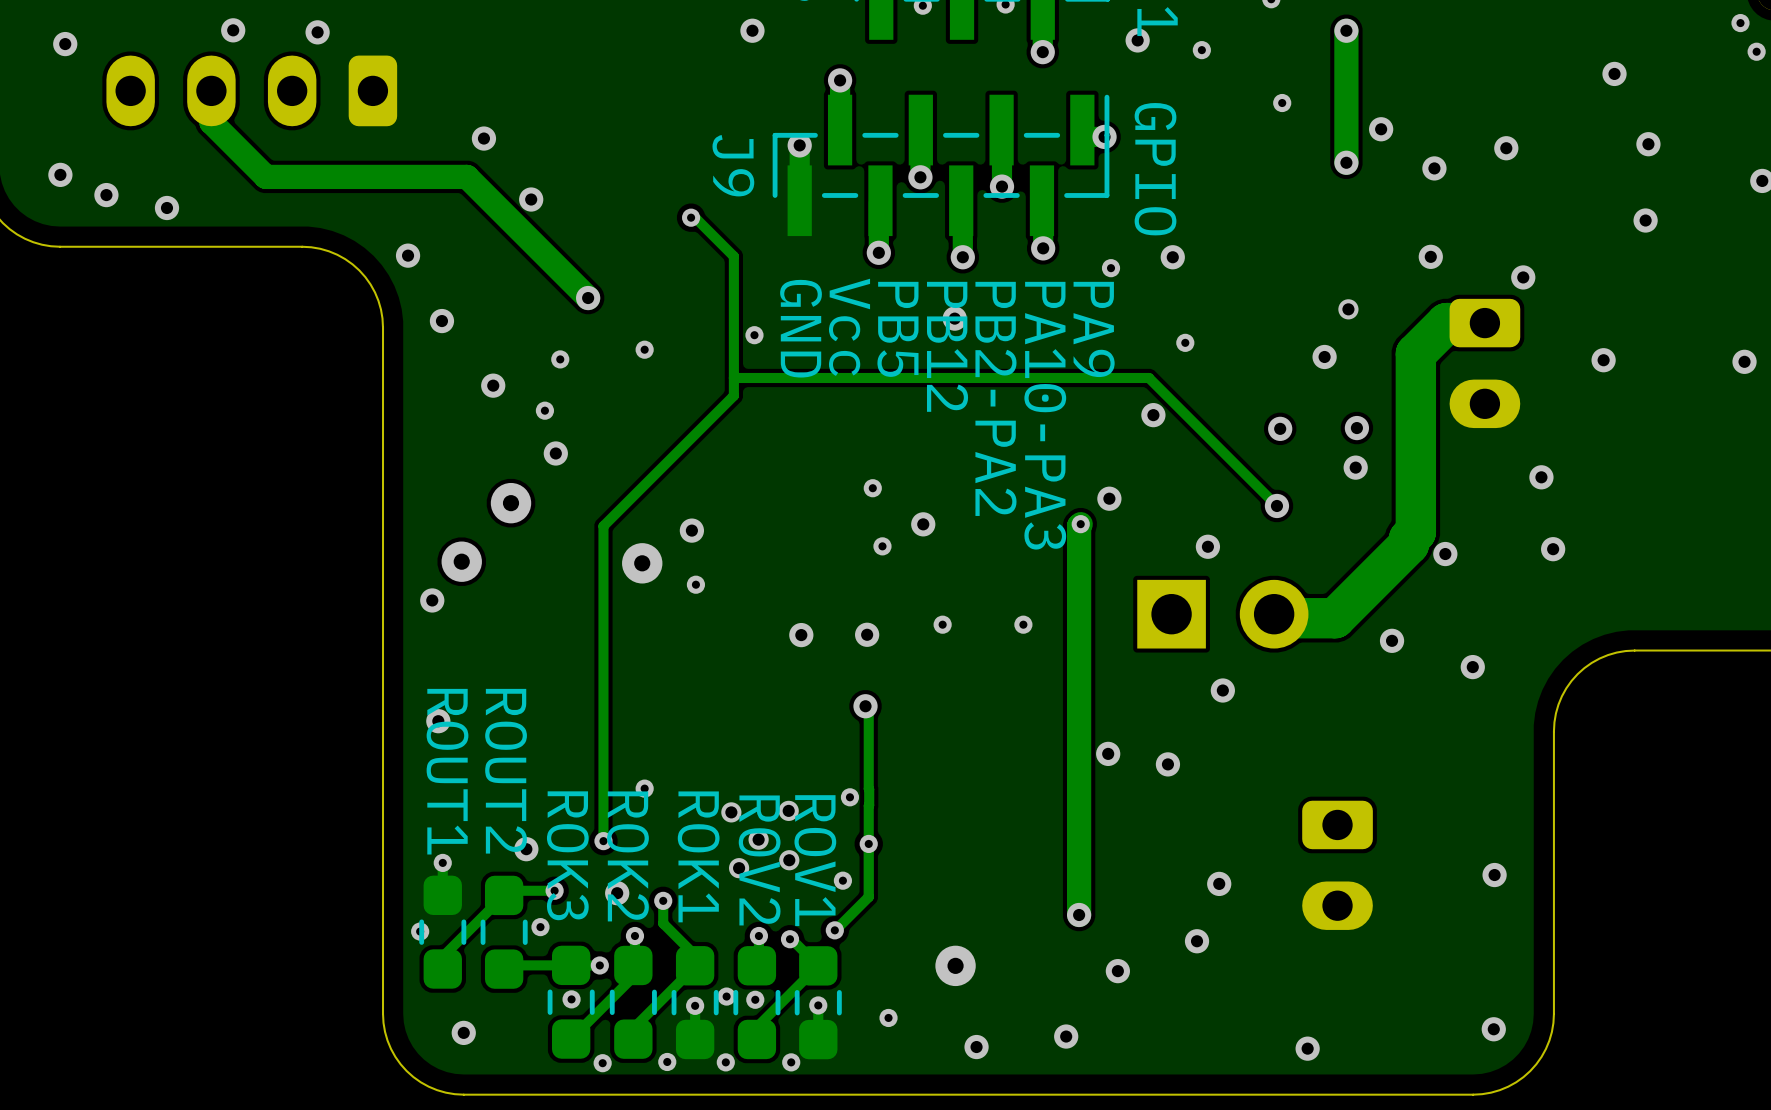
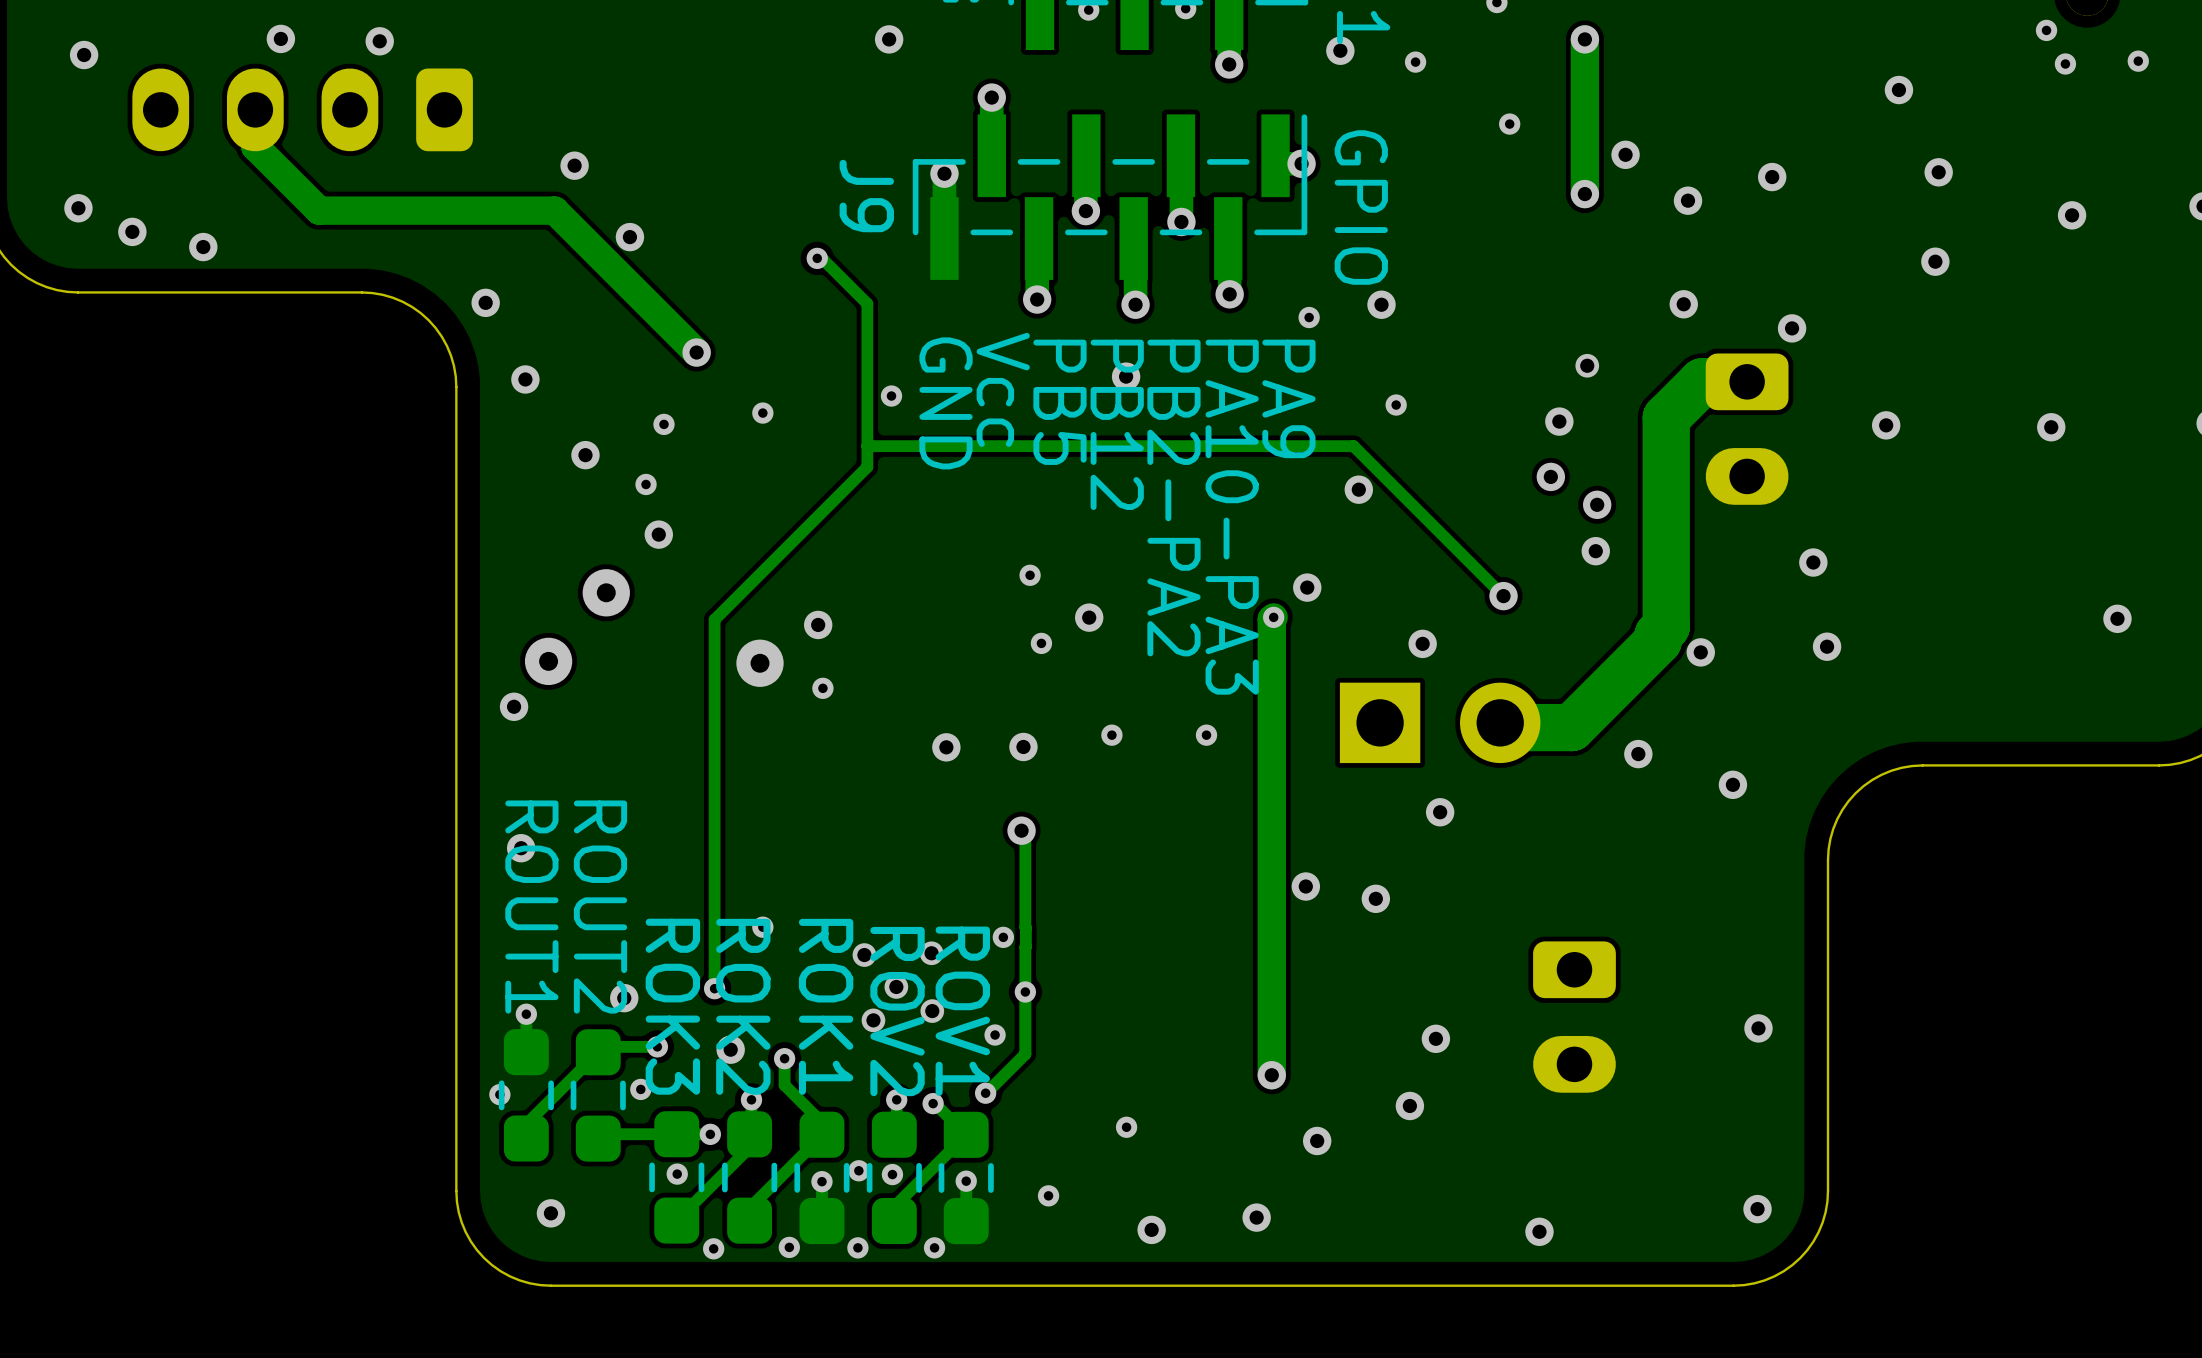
via position: (1280, 428) -> (1550, 476)
via size: [935, 945, 976, 987] -> [1115, 1116, 1138, 1138]

